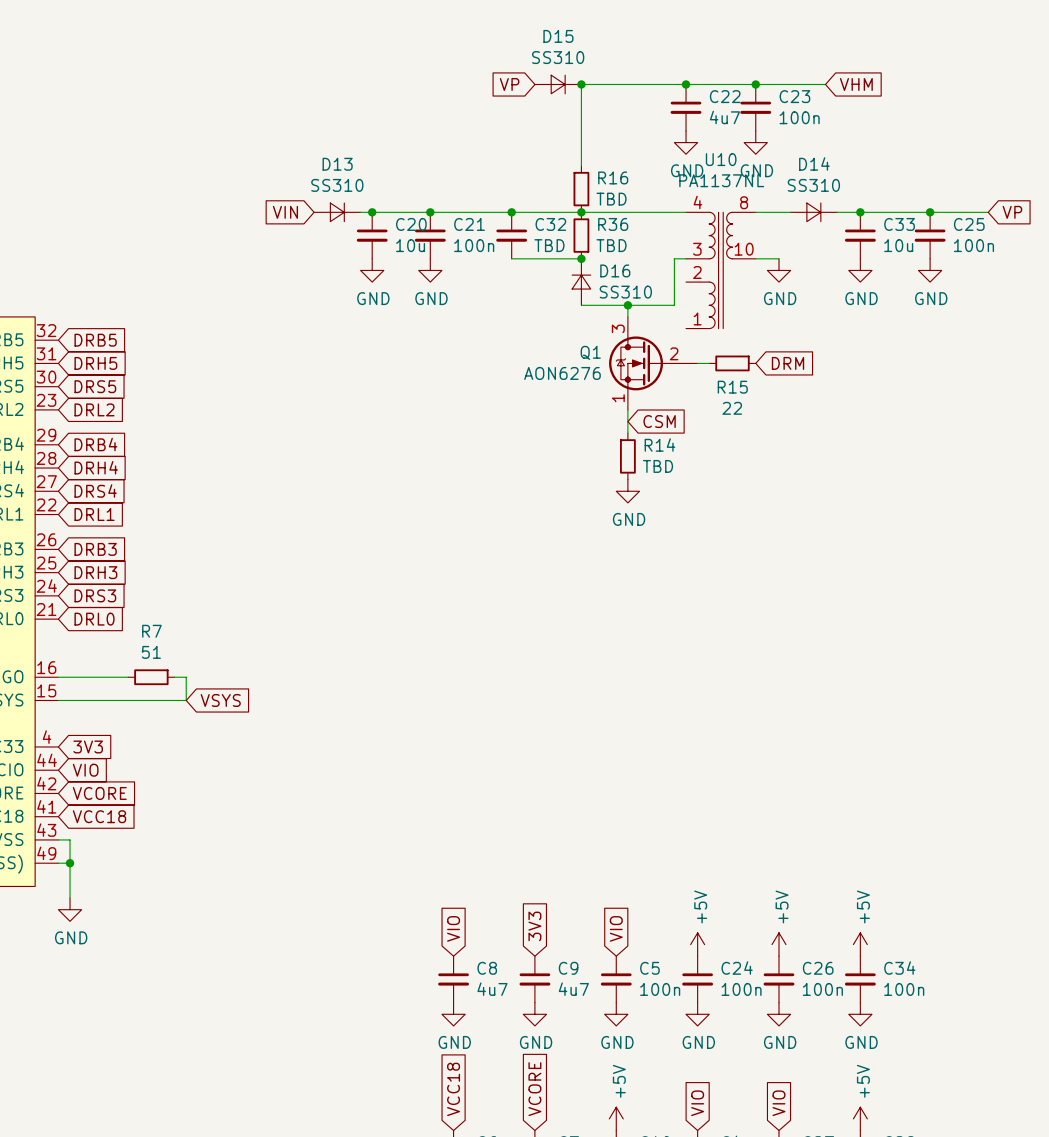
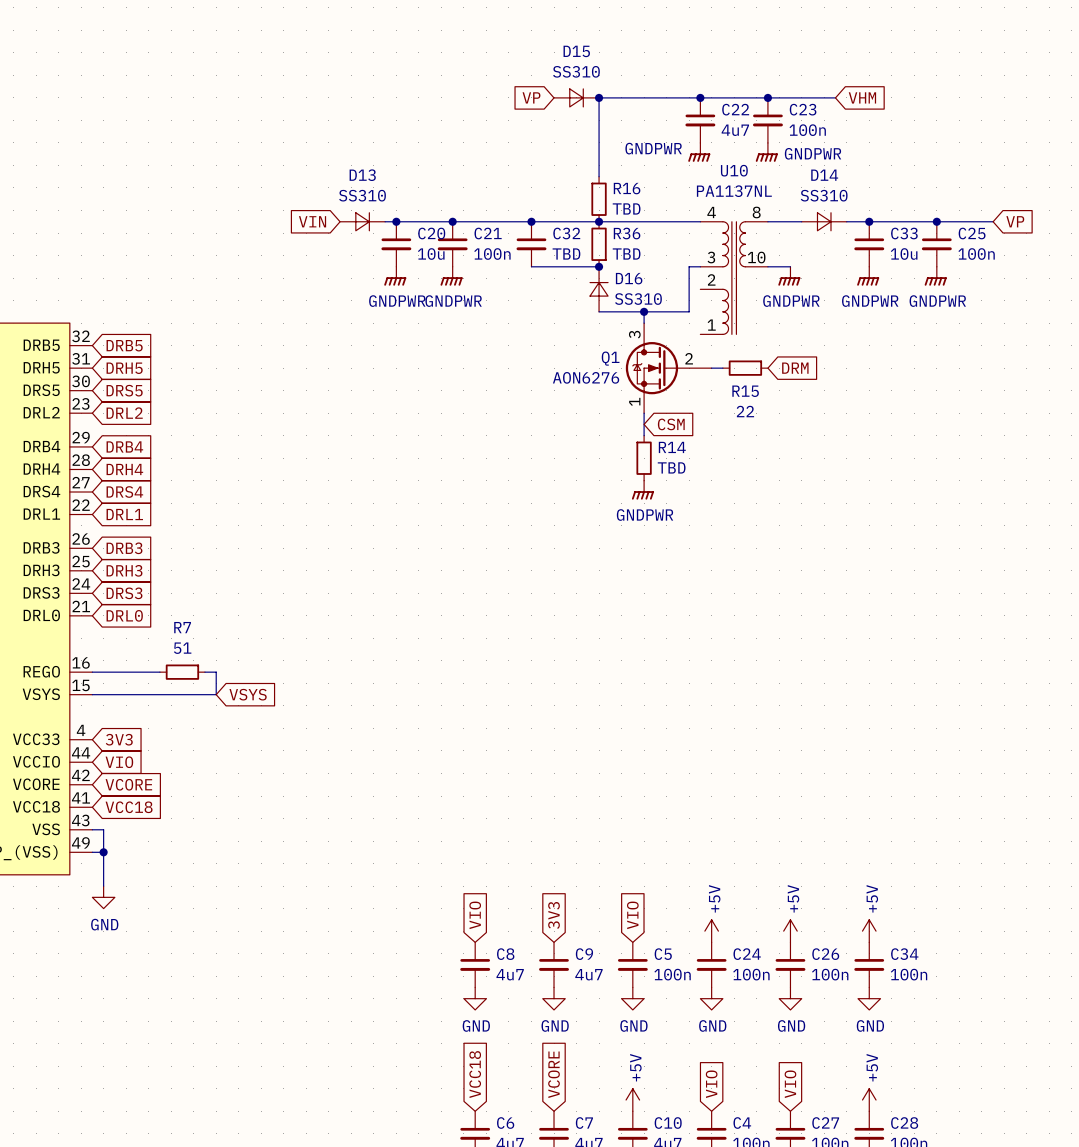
power symbol: GND (686, 142) -> GNDPWR (699, 152)
power symbol: GND (755, 142) -> GNDPWR (766, 152)
power symbol: GND (372, 270) -> GNDPWR (395, 276)
power symbol: GND (430, 270) -> GNDPWR (451, 276)
power symbol: GND (778, 270) -> GNDPWR (789, 276)
power symbol: GND (860, 270) -> GNDPWR (868, 276)
power symbol: GND (930, 270) -> GNDPWR (935, 276)
power symbol: GND (627, 491) -> GNDPWR (642, 490)

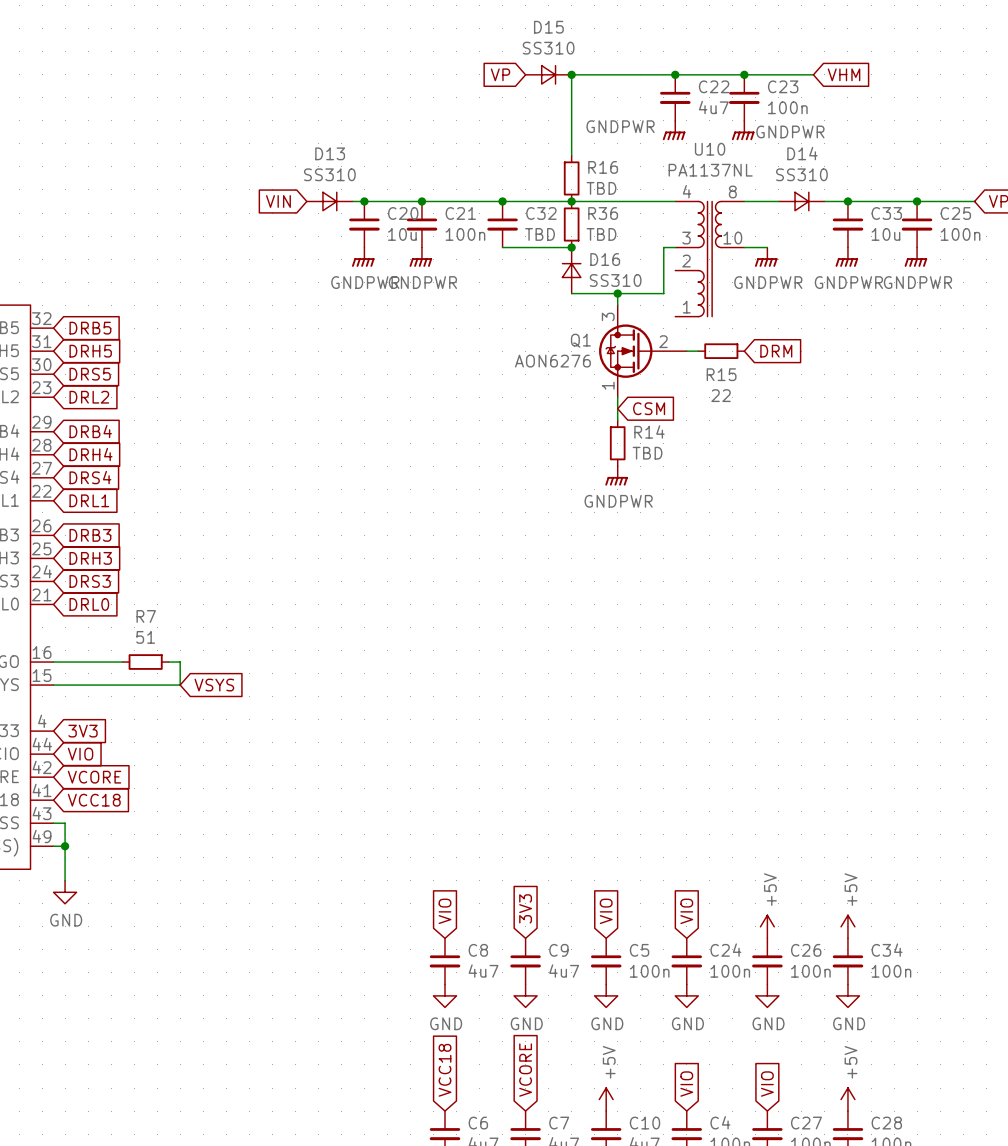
global label: none -> VIO (686, 911)
power symbol: +5V (711, 931) -> none

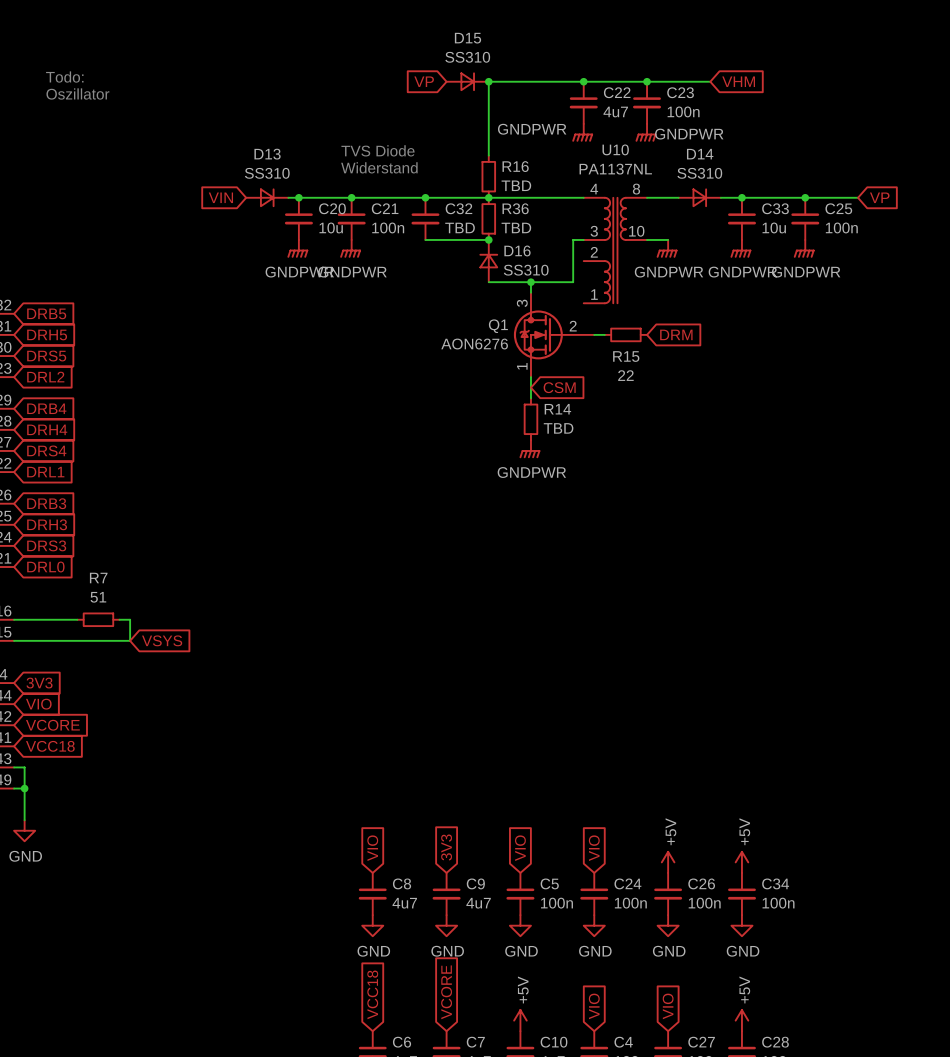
text: none -> Todo: (64, 77)
text: none -> Oszillator (77, 93)
text: none -> TVS Diode (378, 150)
text: none -> Widerstand (379, 167)

